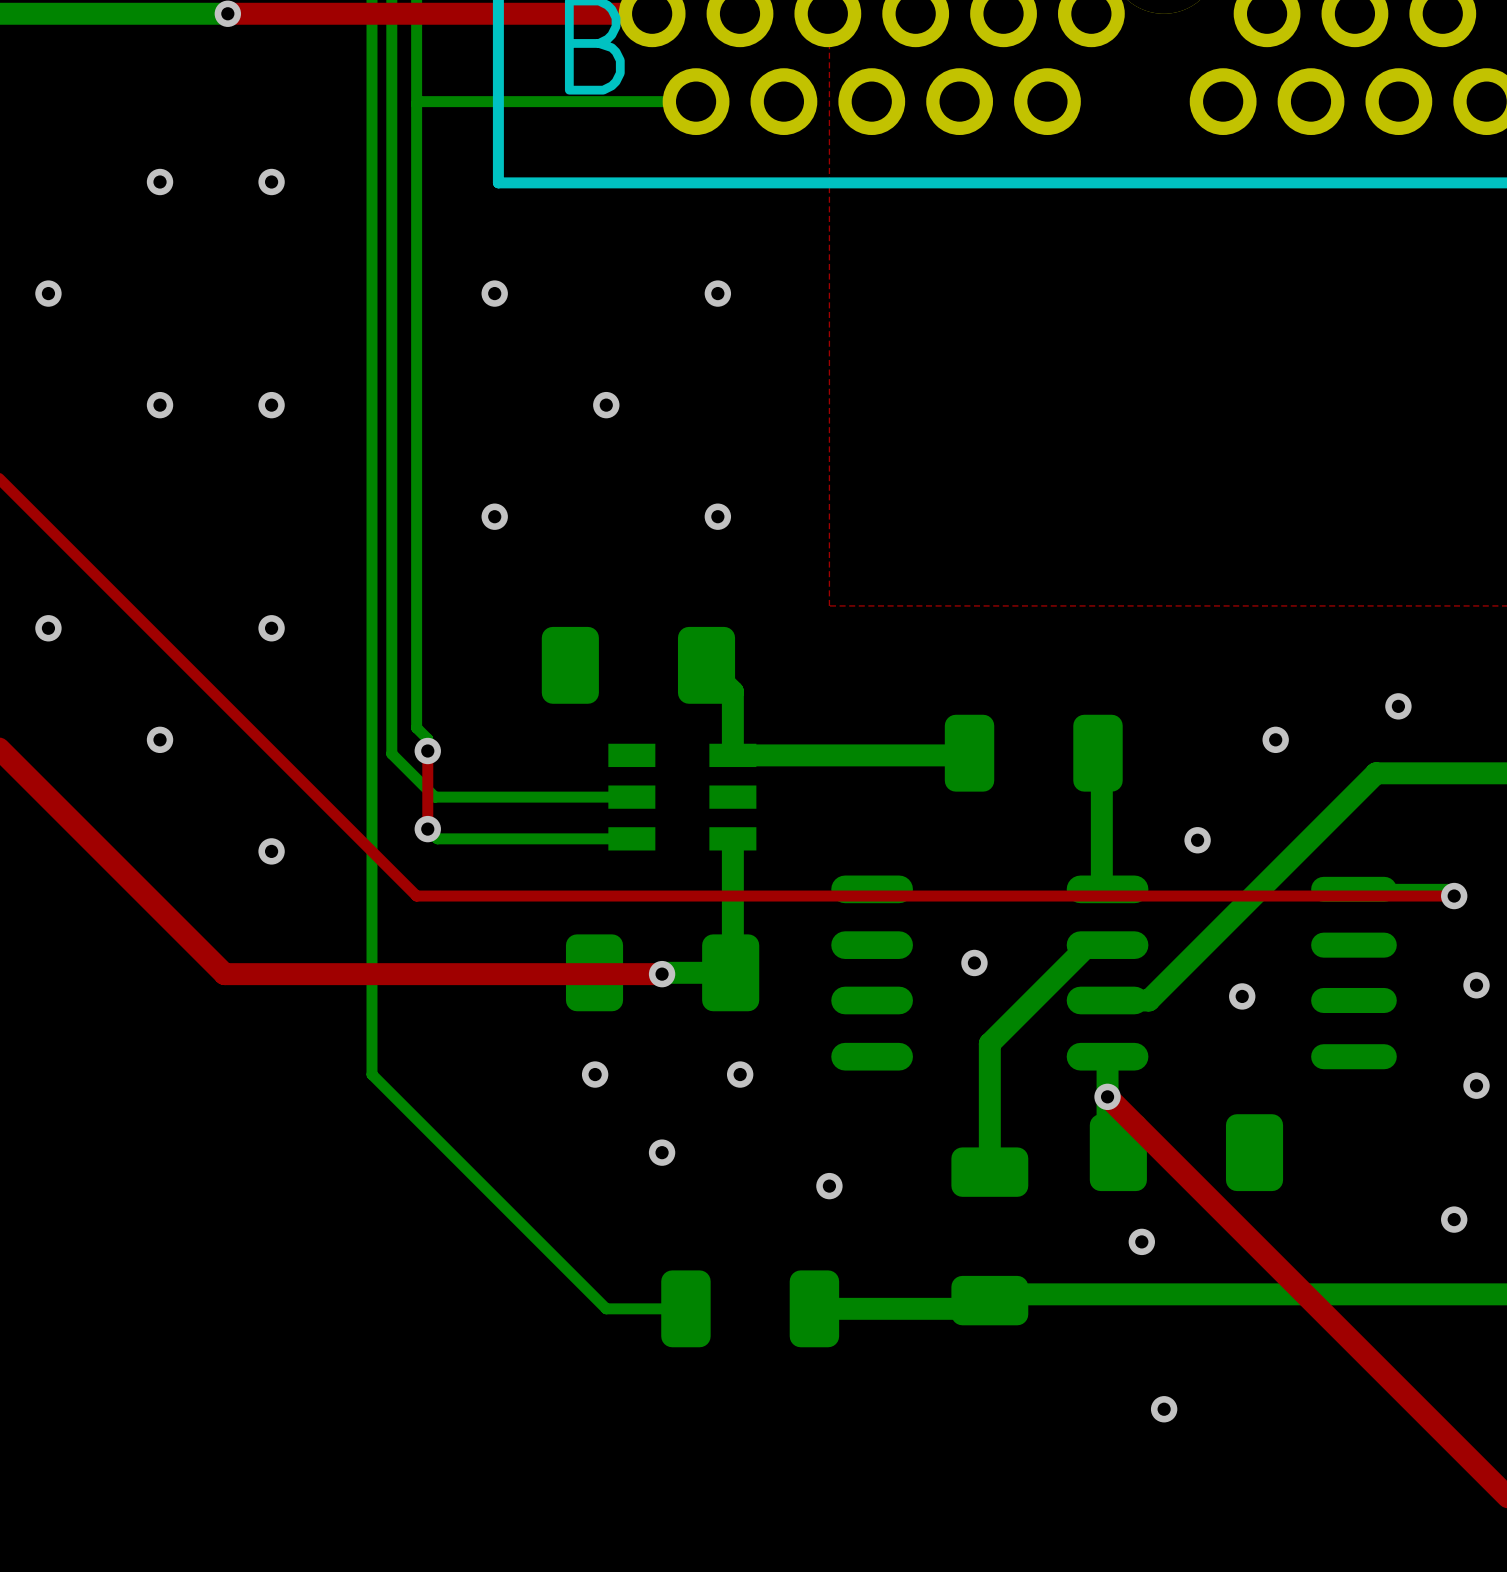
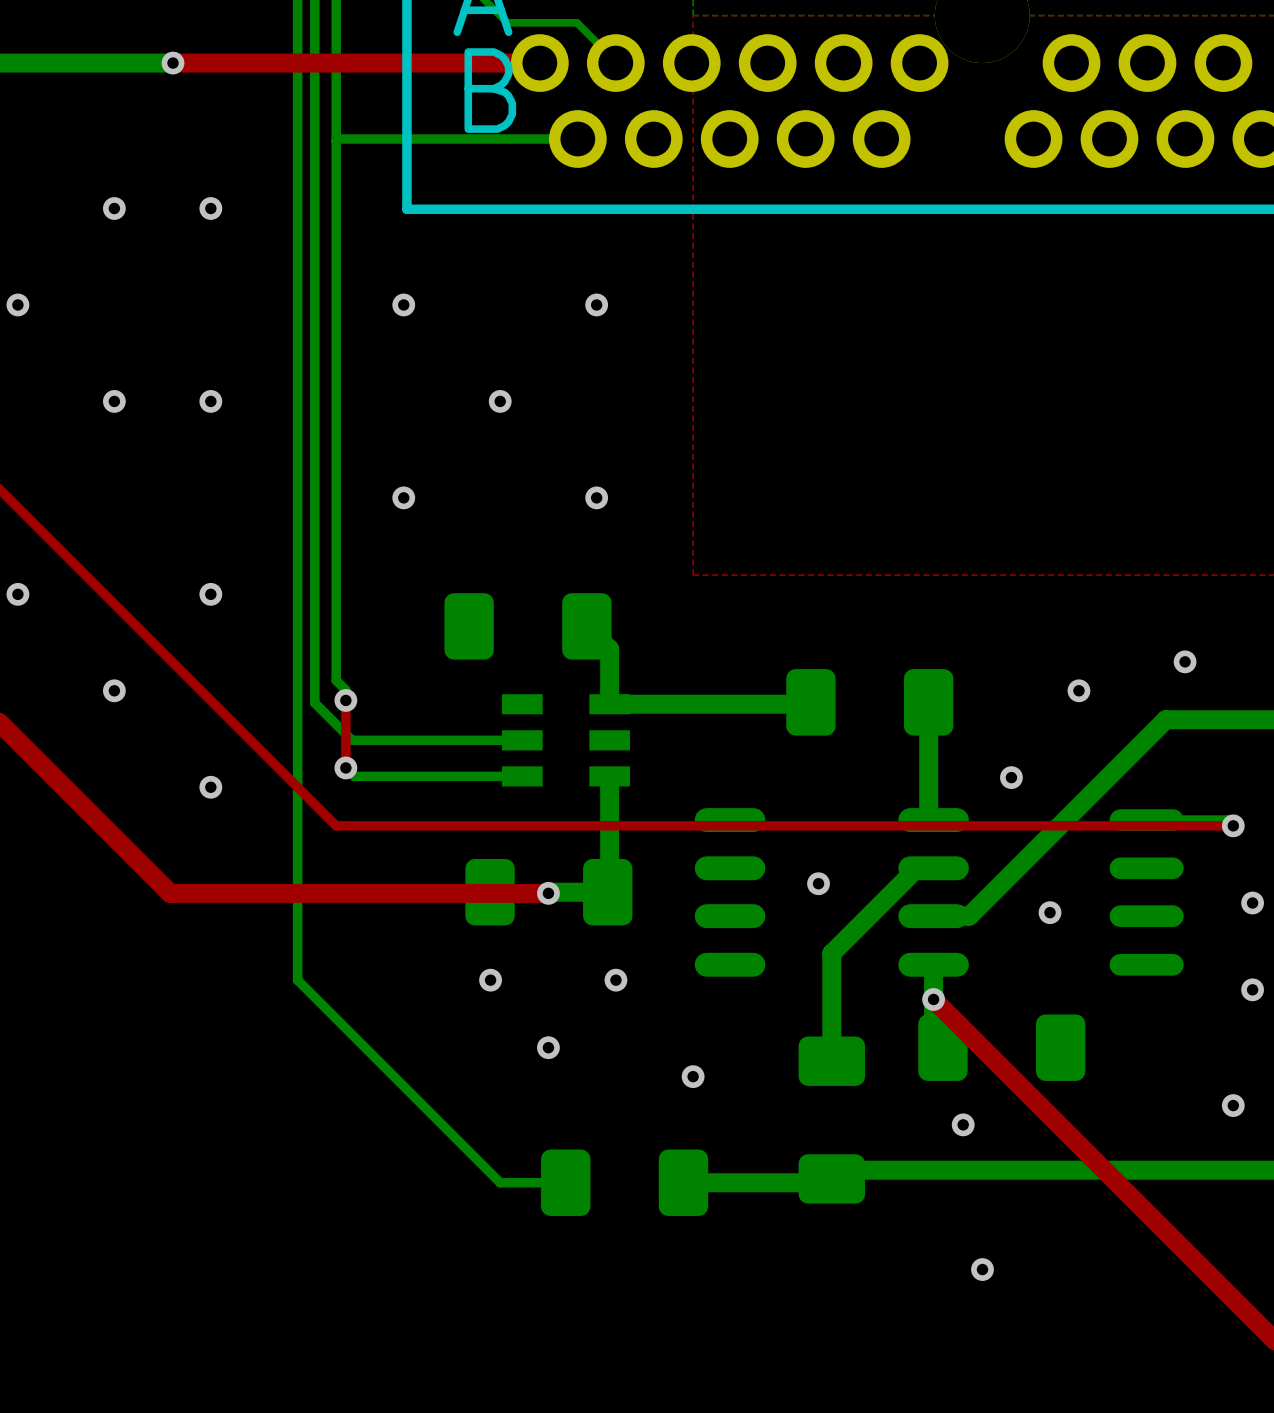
part footprint: [944, 714, 1123, 792] -> [786, 669, 954, 736]
part footprint: [951, 1147, 1029, 1326] -> [798, 1036, 866, 1204]
part footprint: [661, 1270, 840, 1348] -> [541, 1149, 709, 1216]

